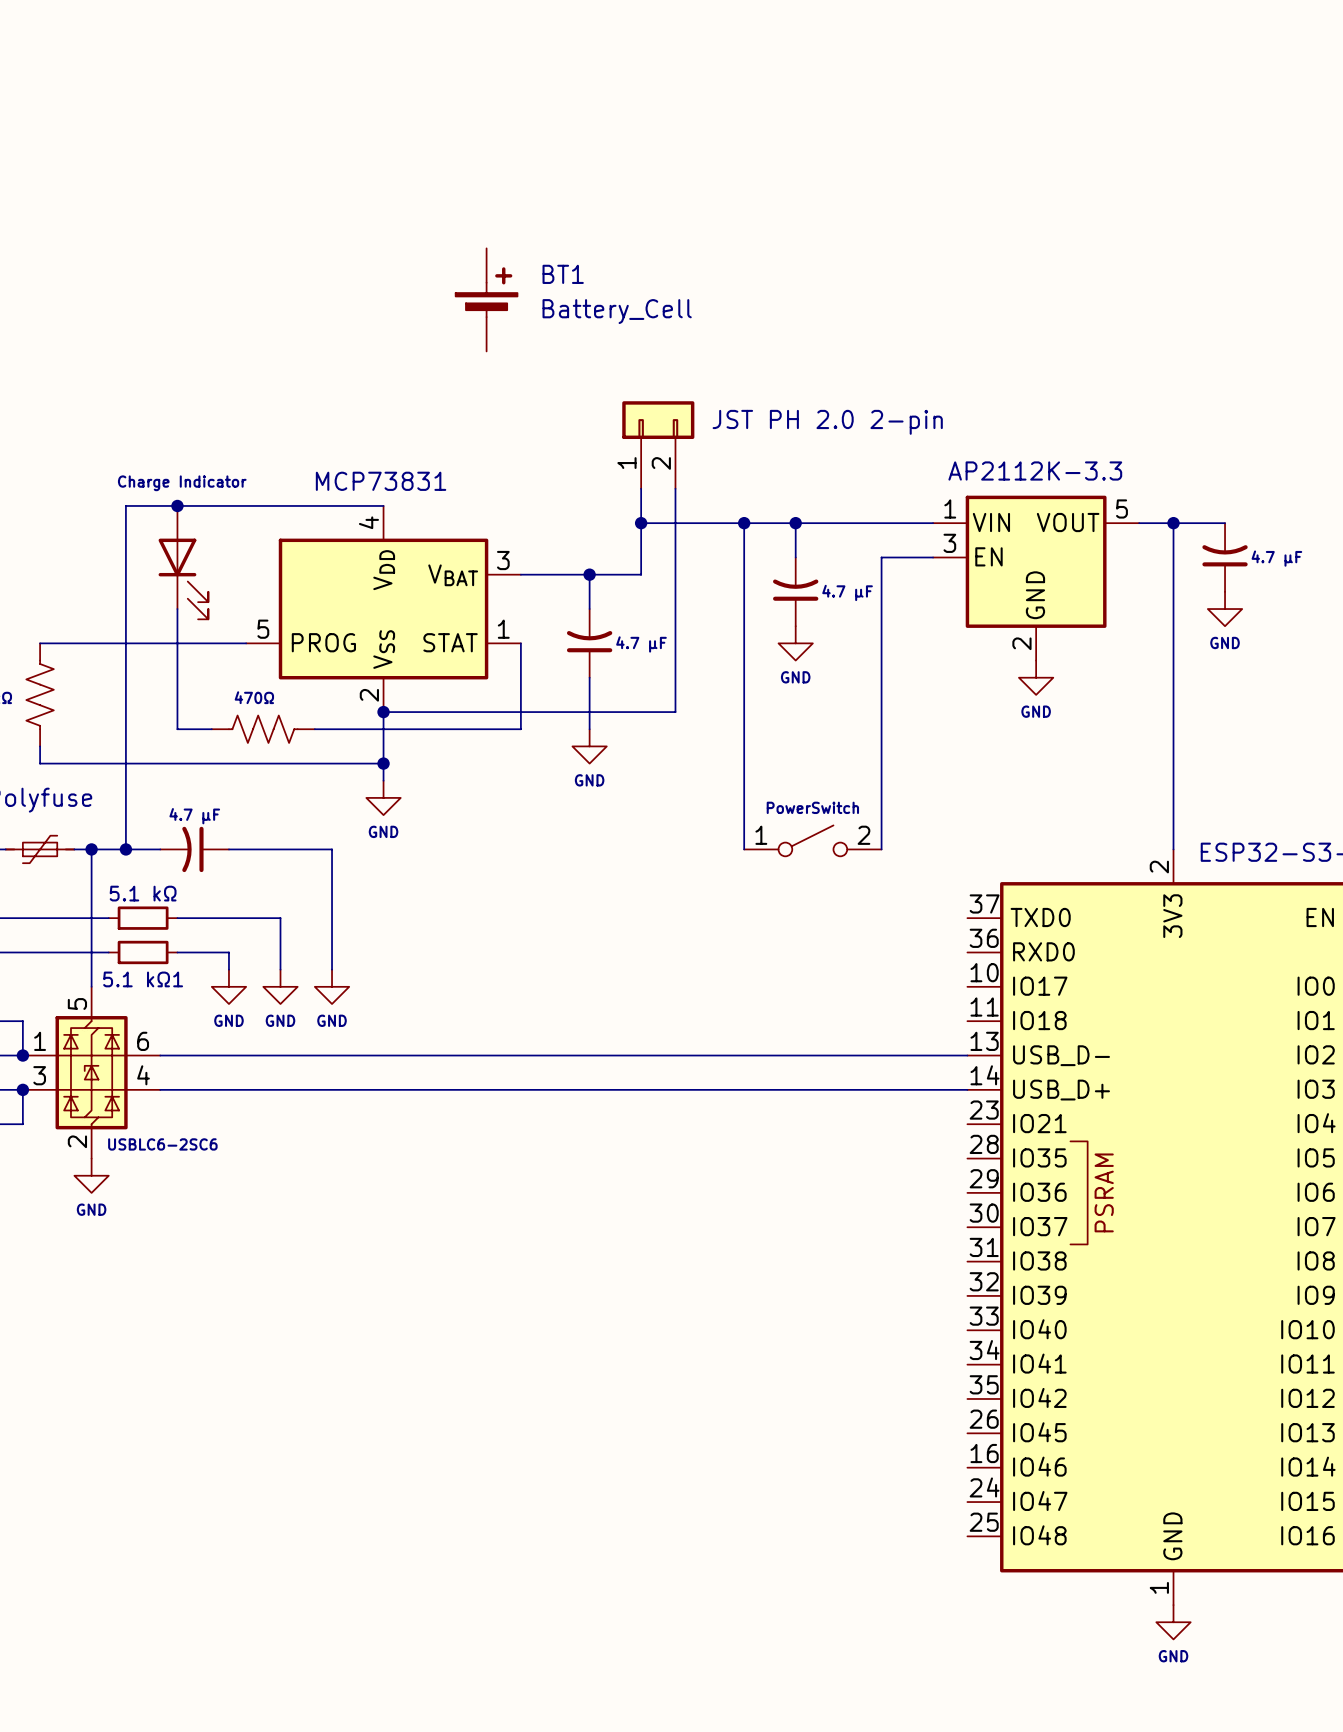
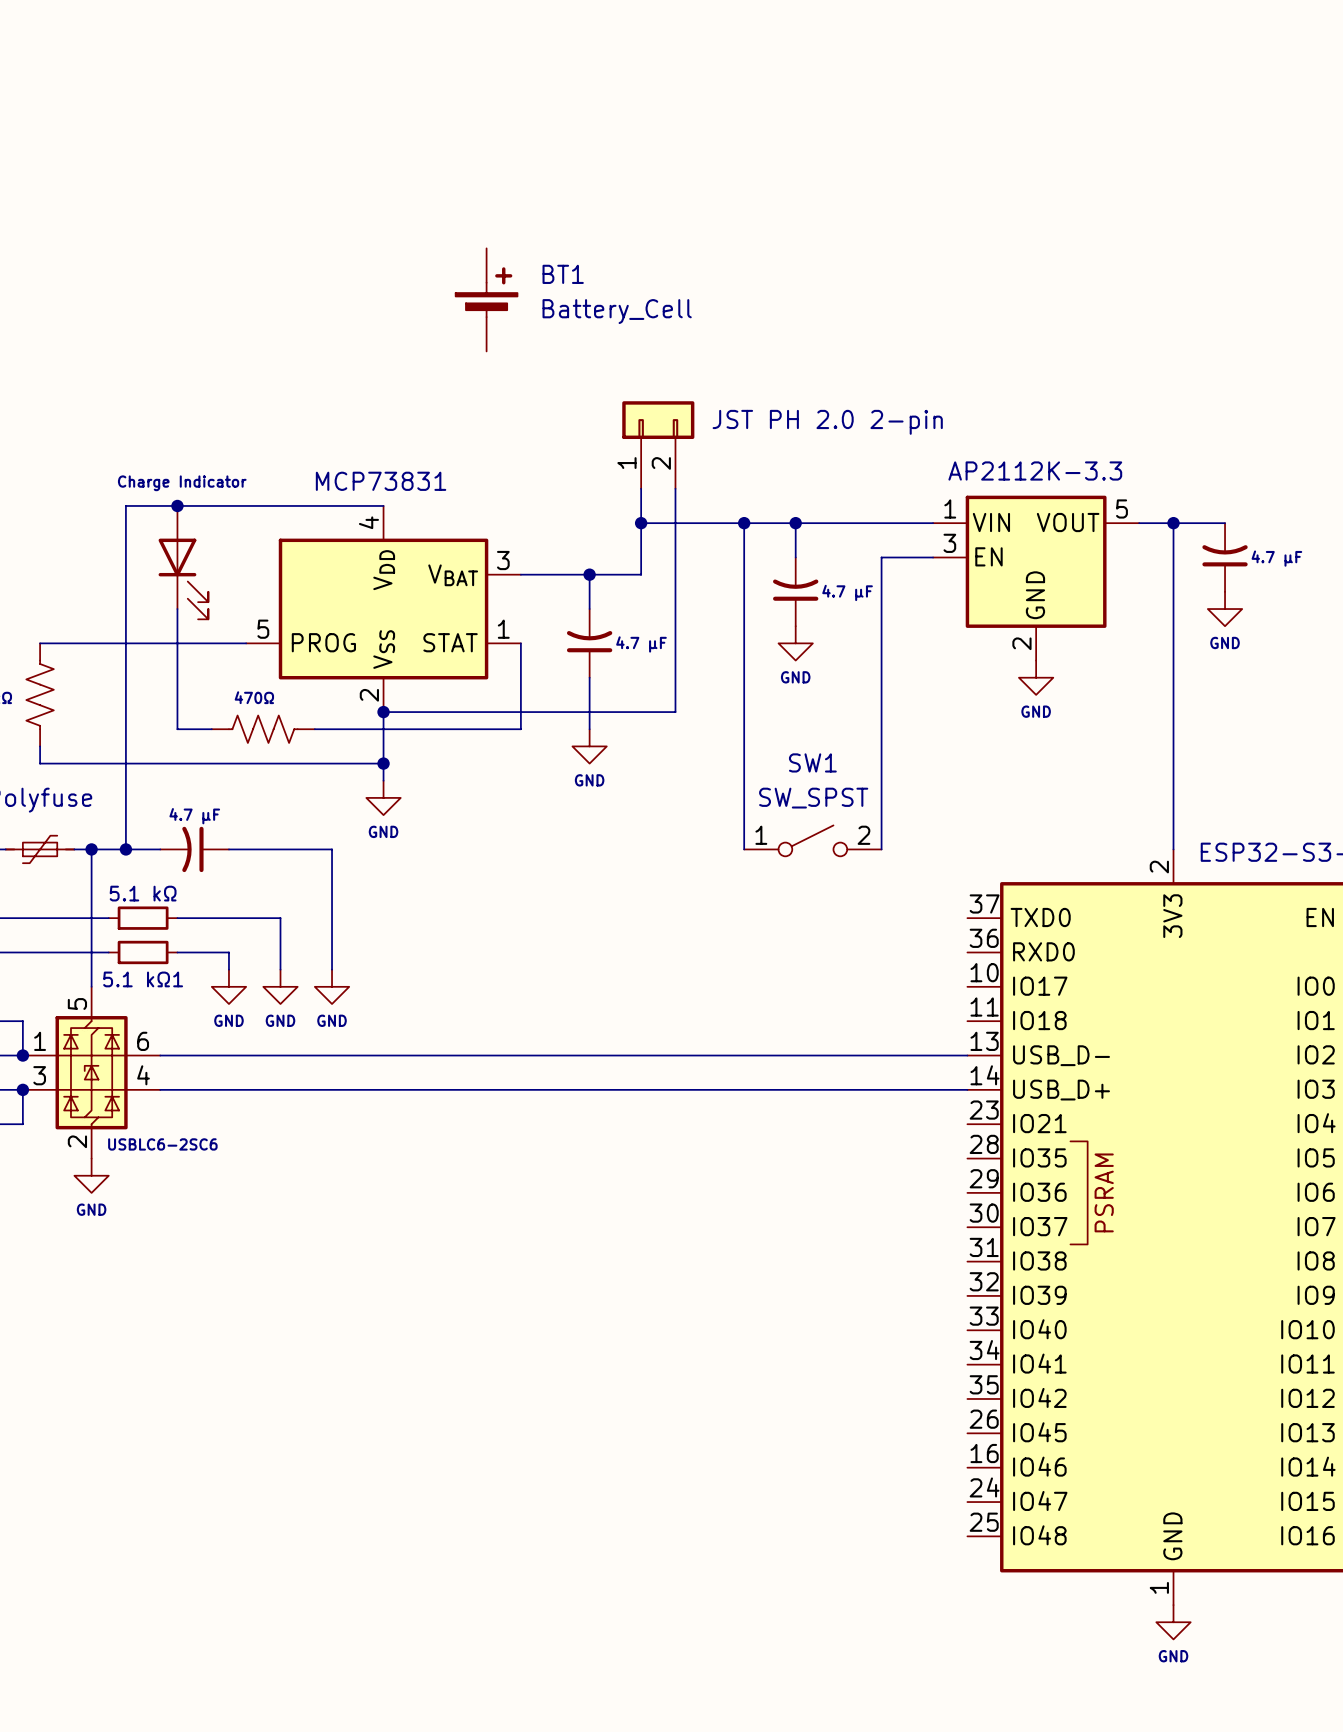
PowerSwitch value: none -> SW_SPST (813, 798)
PowerSwitch name: PowerSwitch (812, 807) -> SW1 (812, 762)

